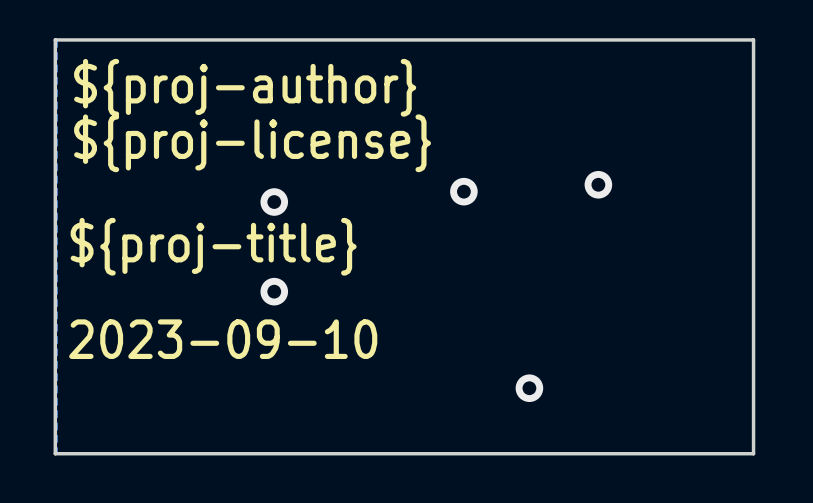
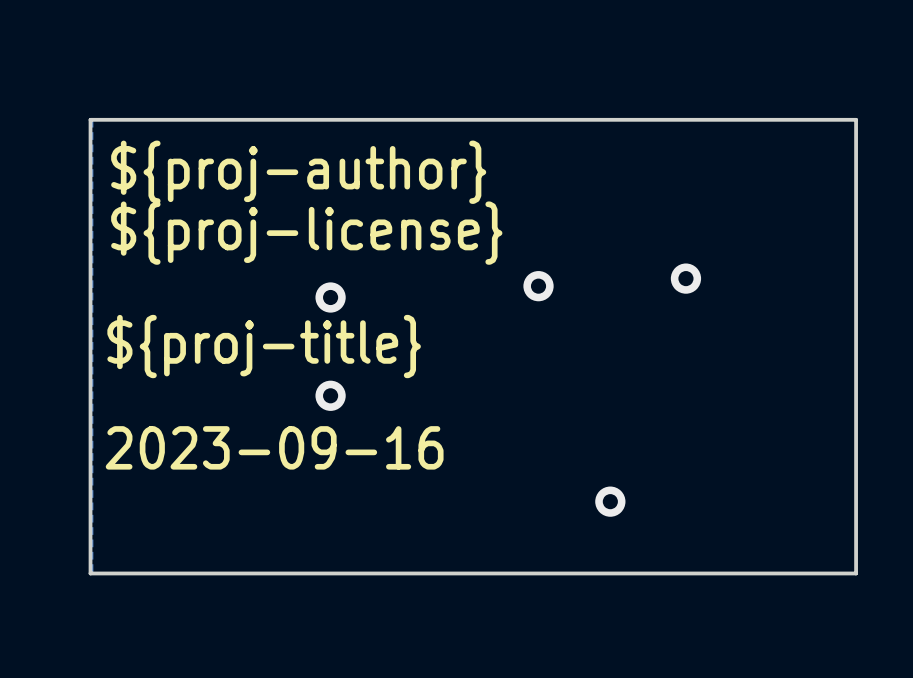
text: 2023-09-10 (223, 339) -> 2023-09-16 (274, 447)

